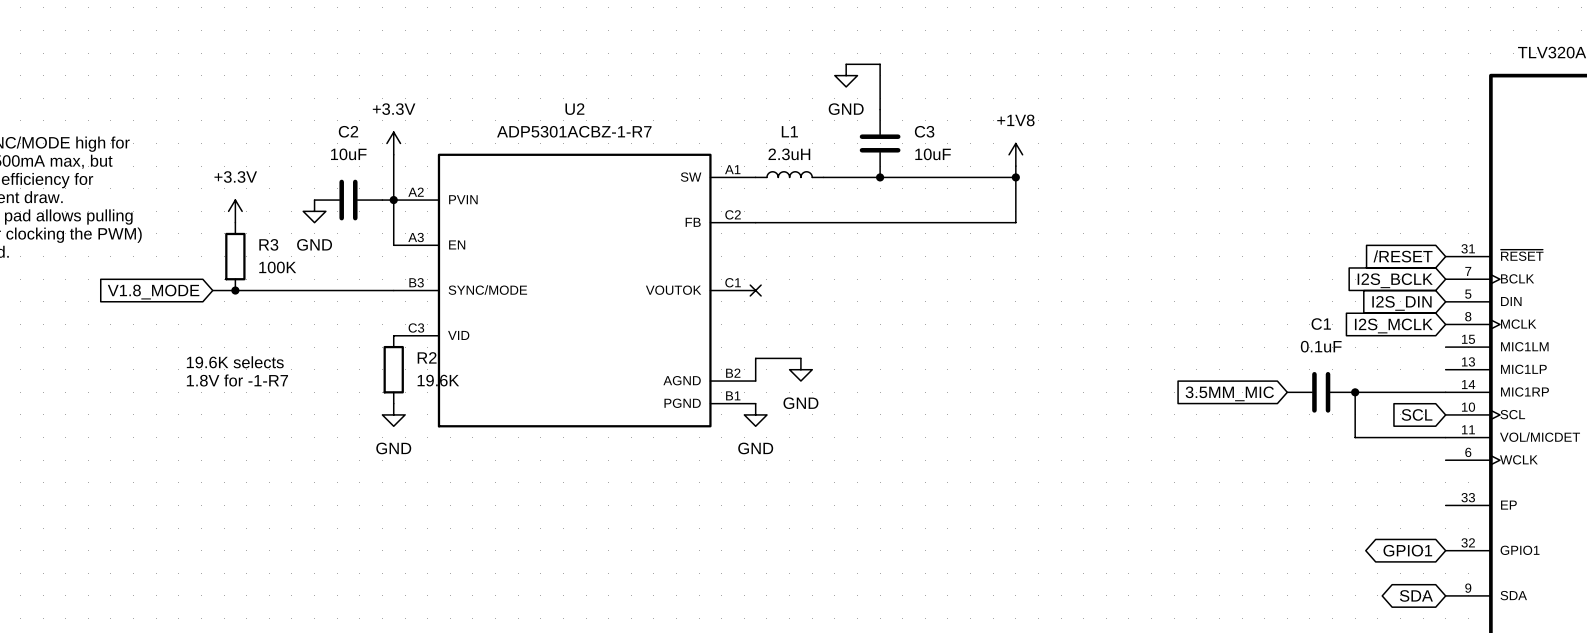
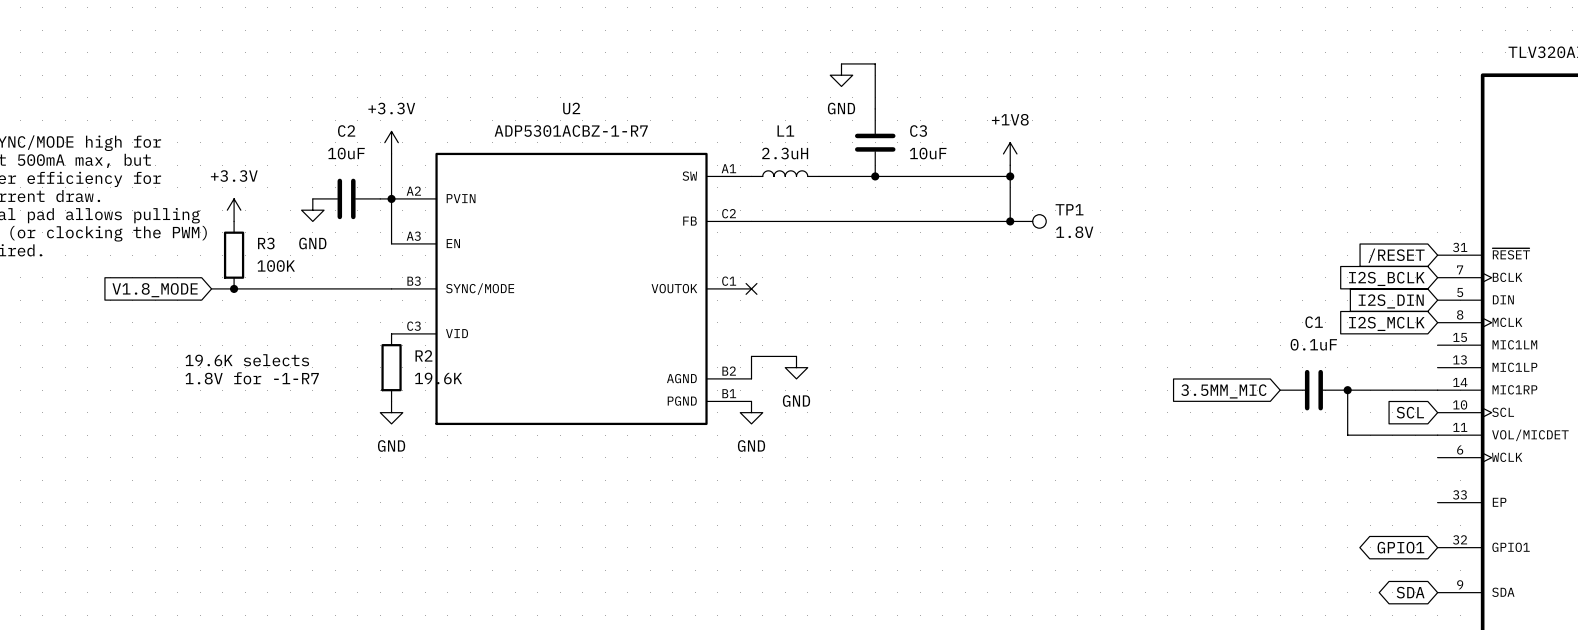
junction: none -> (1010, 221)
TP1: none -> 1.8V (1028, 221)

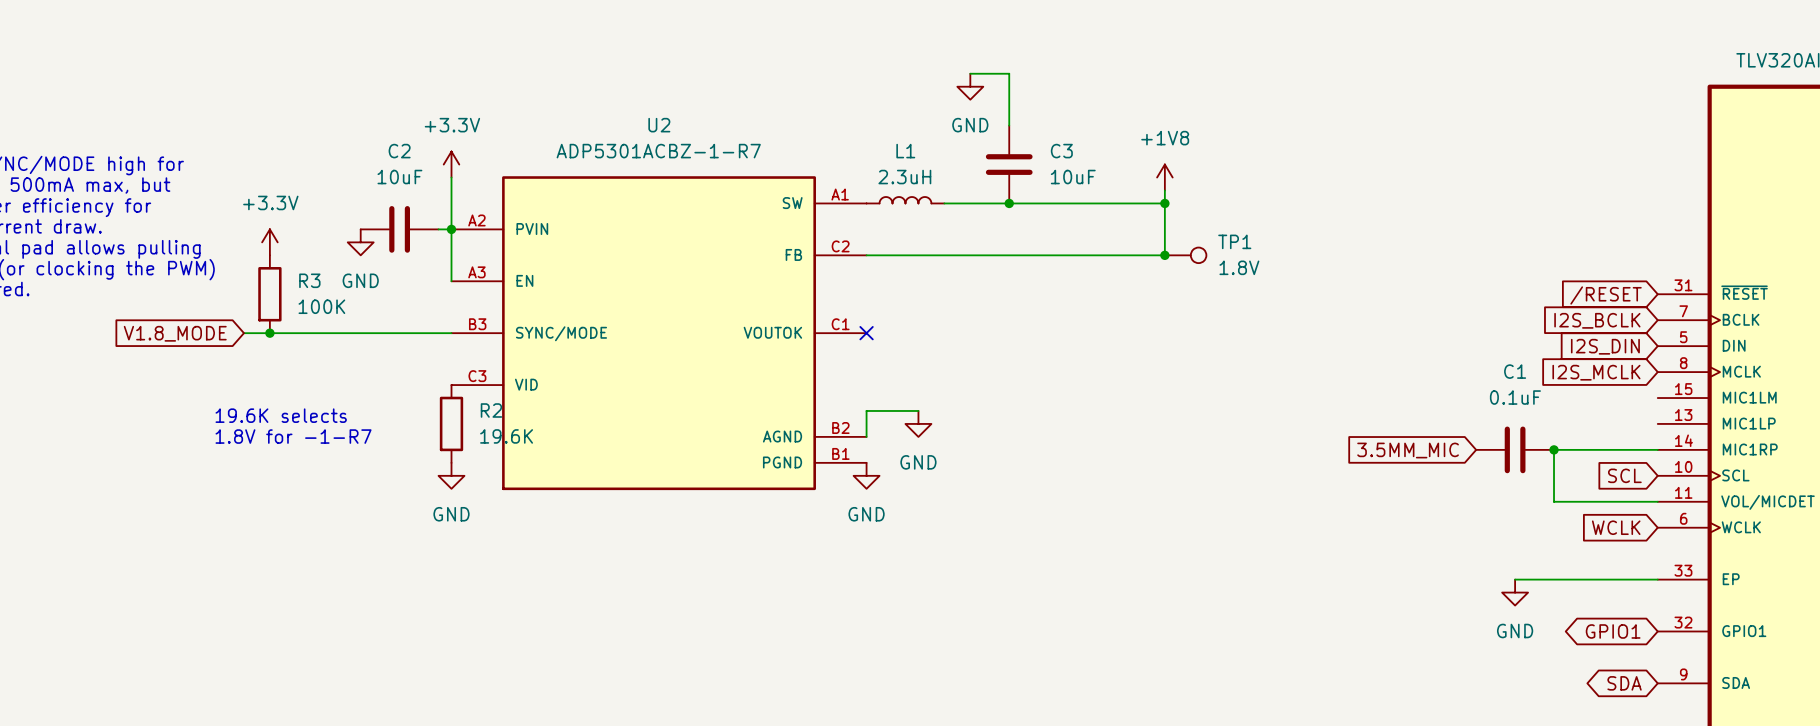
global label: none -> WCLK (1616, 527)
wire: none -> (1515, 579) (1657, 579)
power symbol: none -> GND (1515, 592)

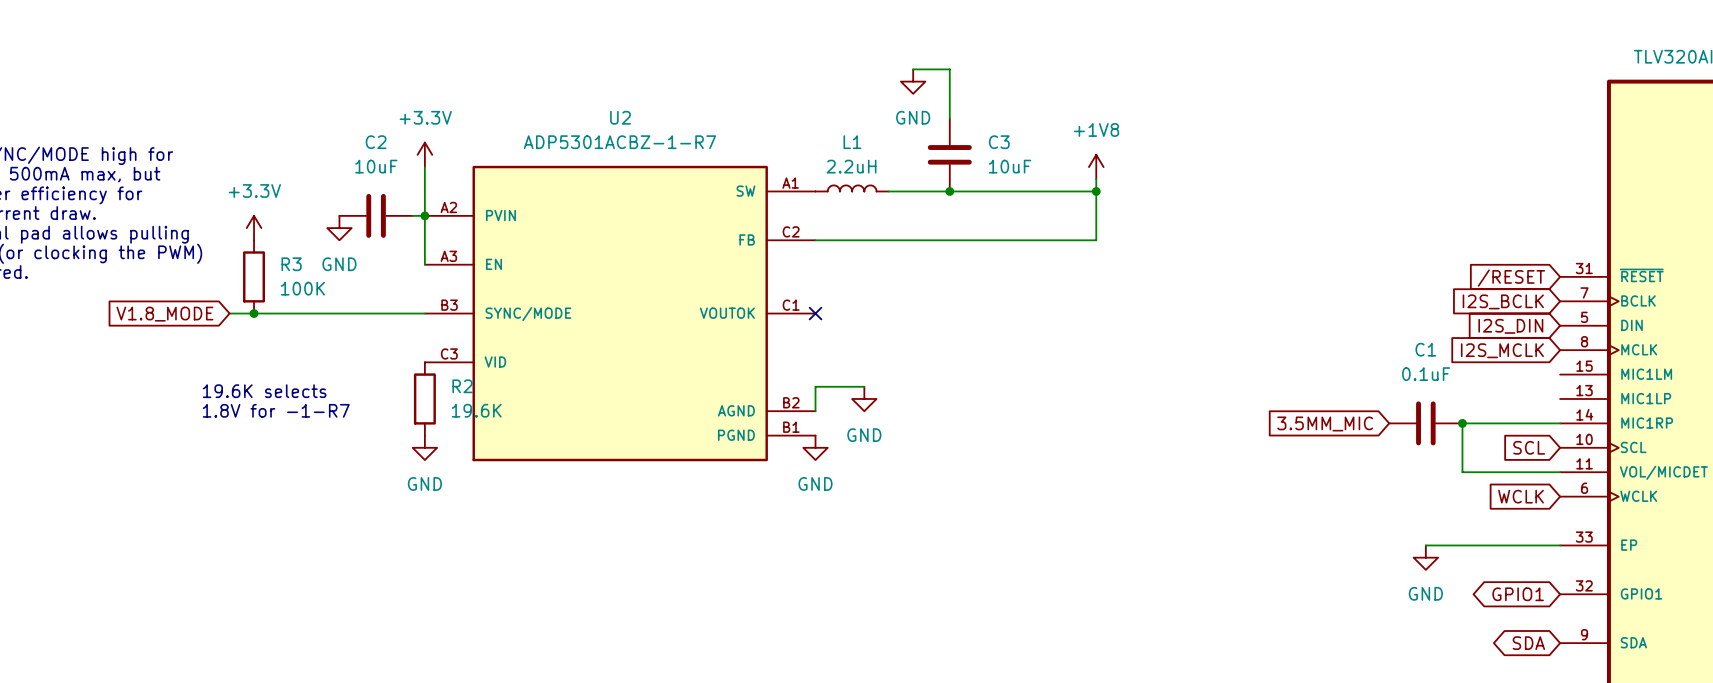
L1 value: 2.3uH (904, 177) -> 2.2uH (851, 166)
junction: (1164, 255) -> none
TP1: 1.8V (1185, 255) -> none

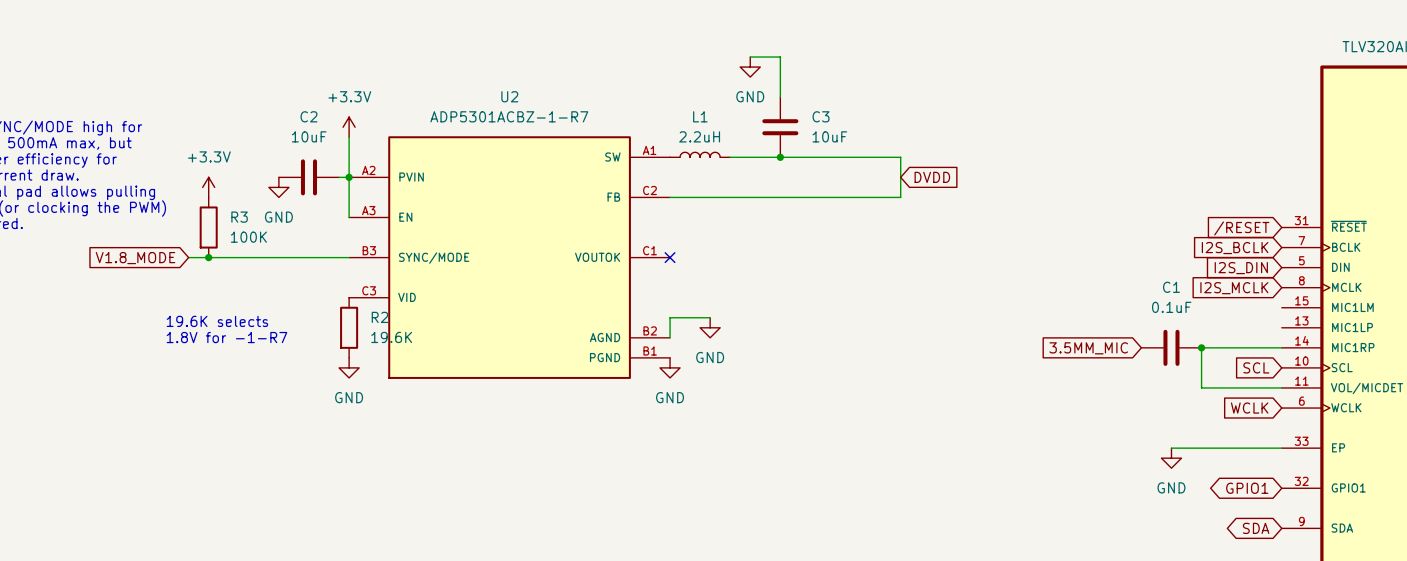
power symbol: +1V8 (1096, 167) -> none
wire: (1096, 179) (1096, 191) -> none
junction: (1096, 191) -> none
global label: none -> DVDD (932, 177)

